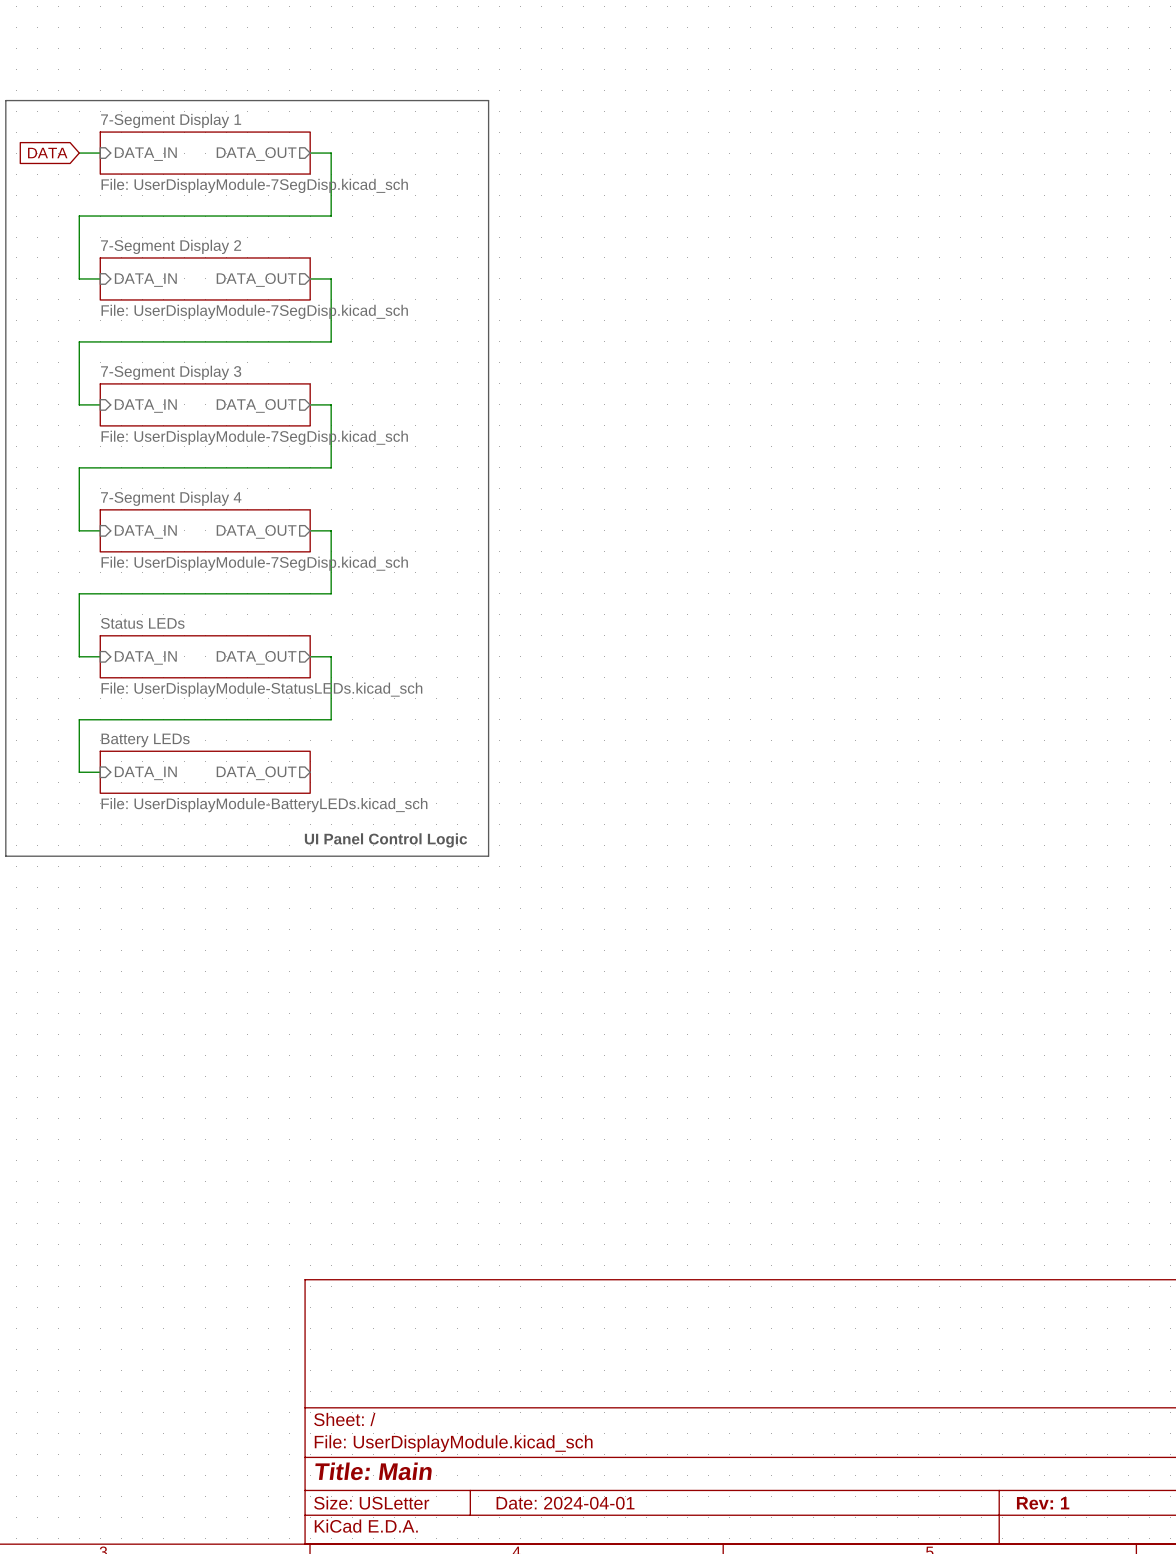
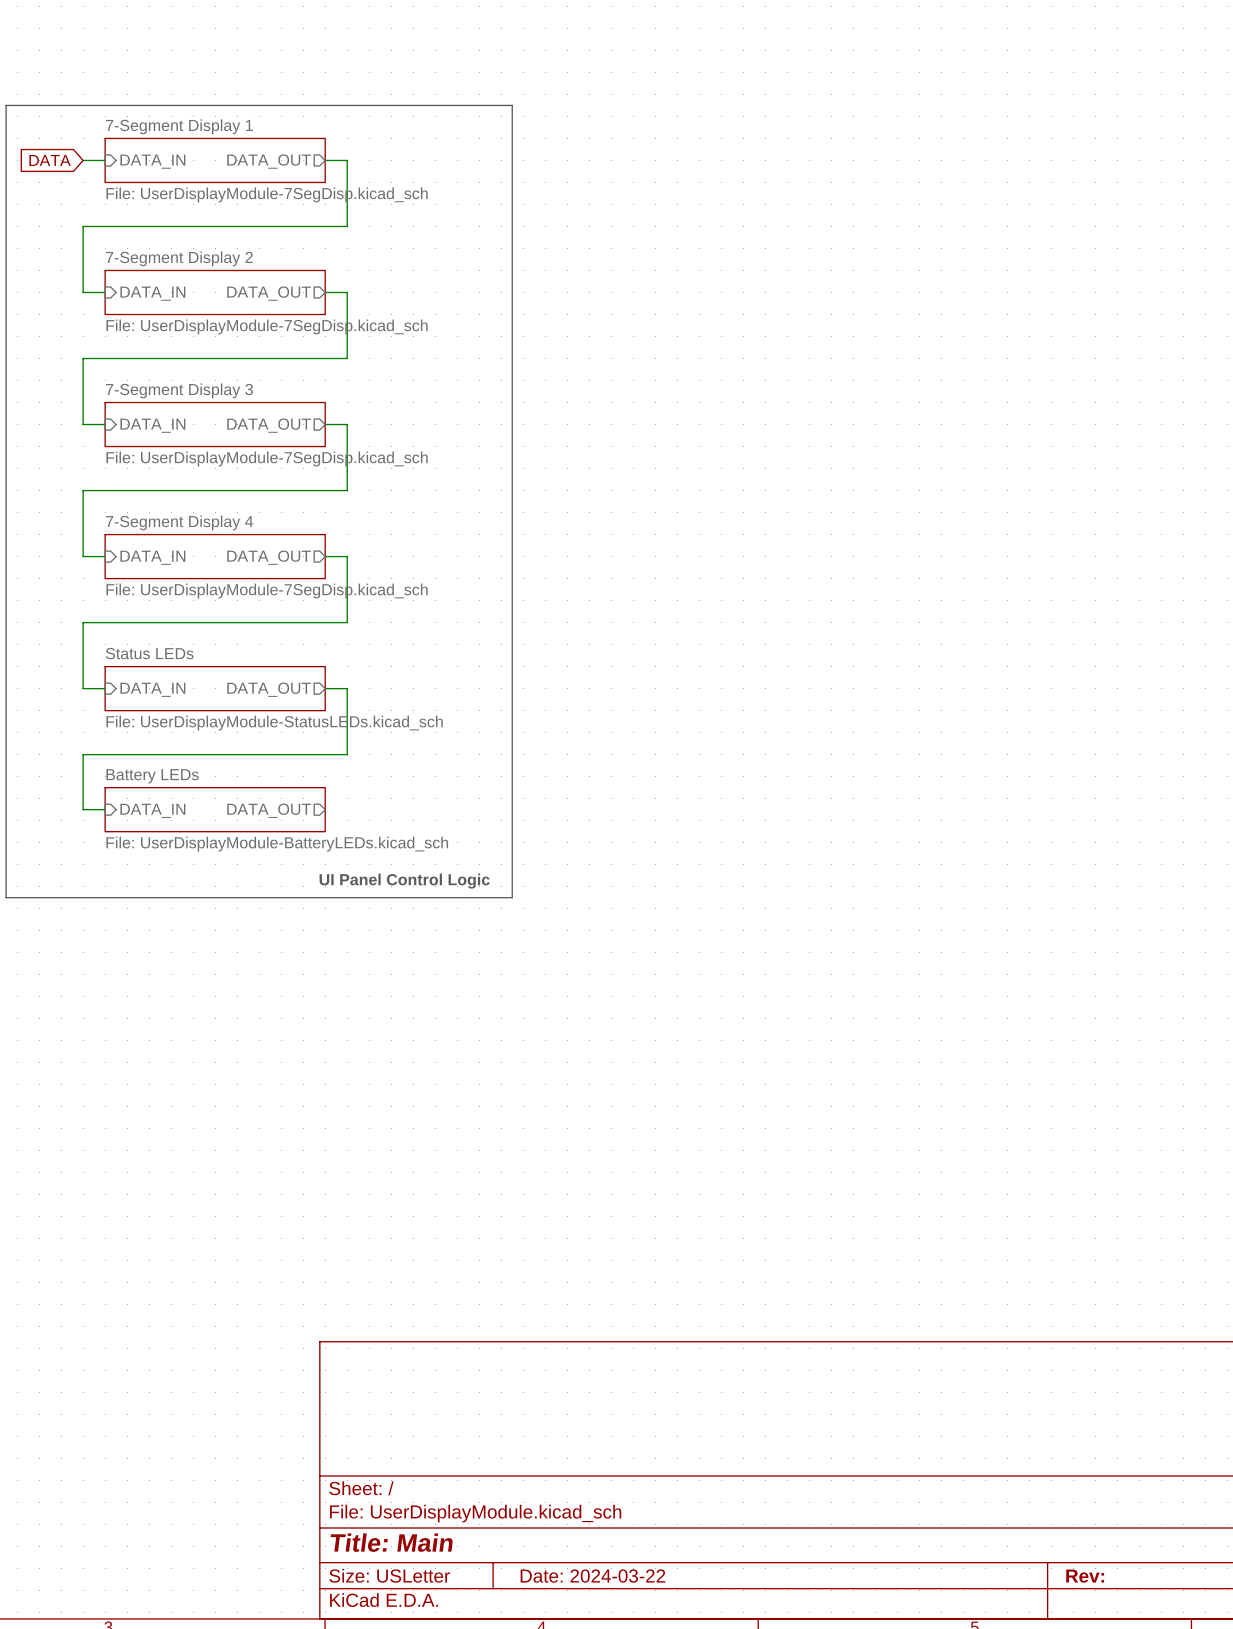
title block: Date: 2024-04-01 (565, 1503) -> Date: 2024-03-22 (592, 1576)
title block: Rev: 1 (1043, 1503) -> Rev: (1085, 1576)

